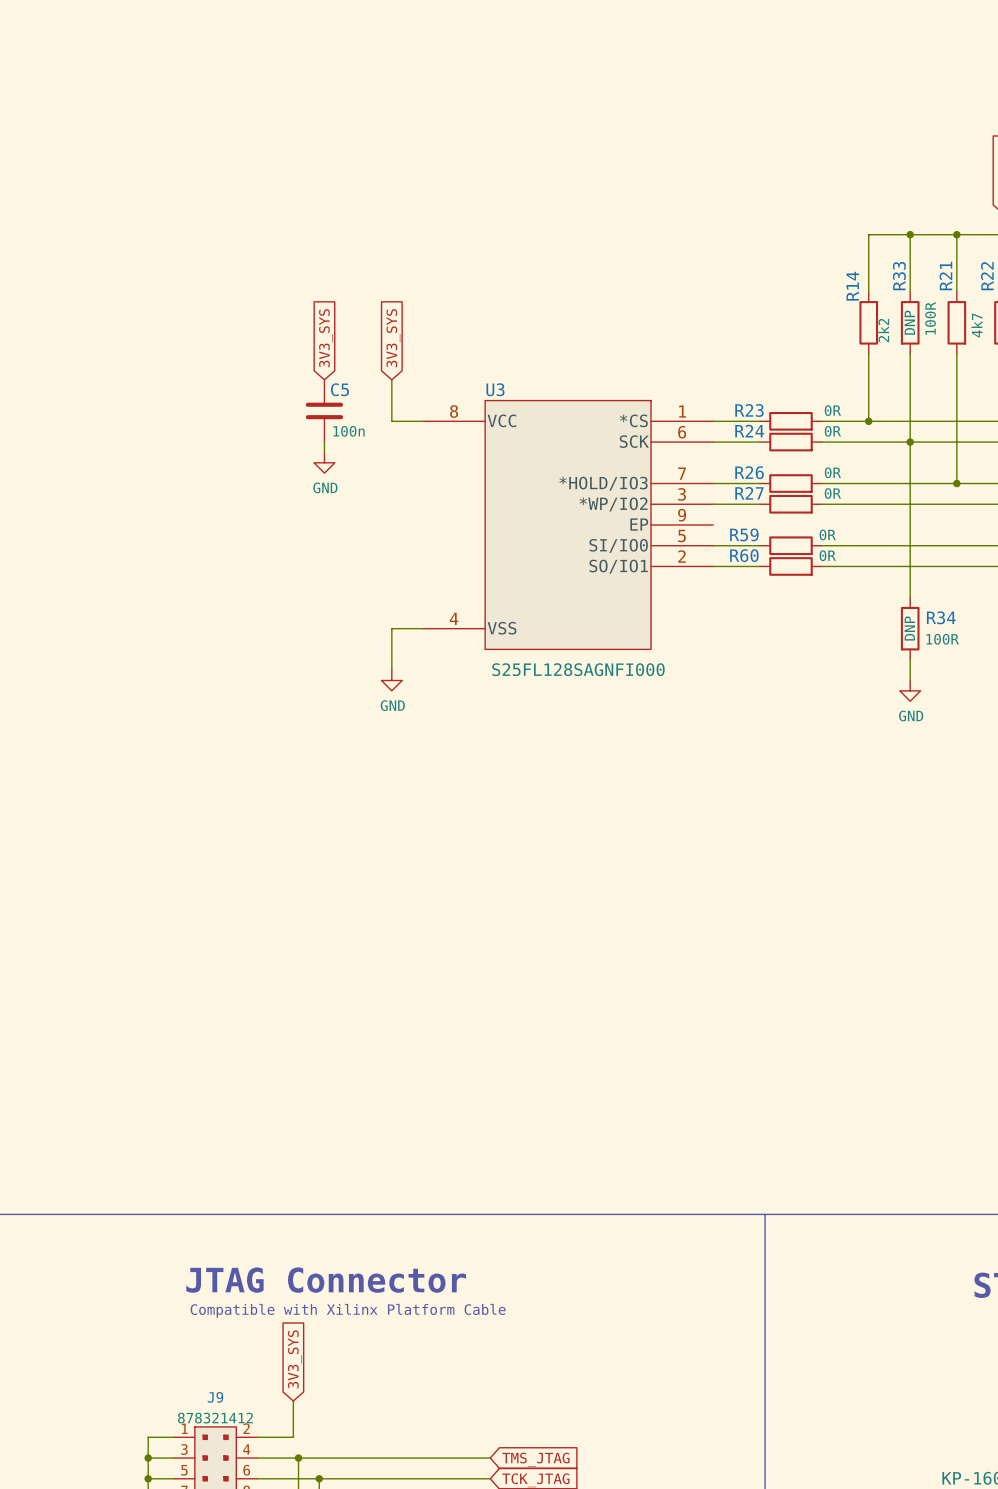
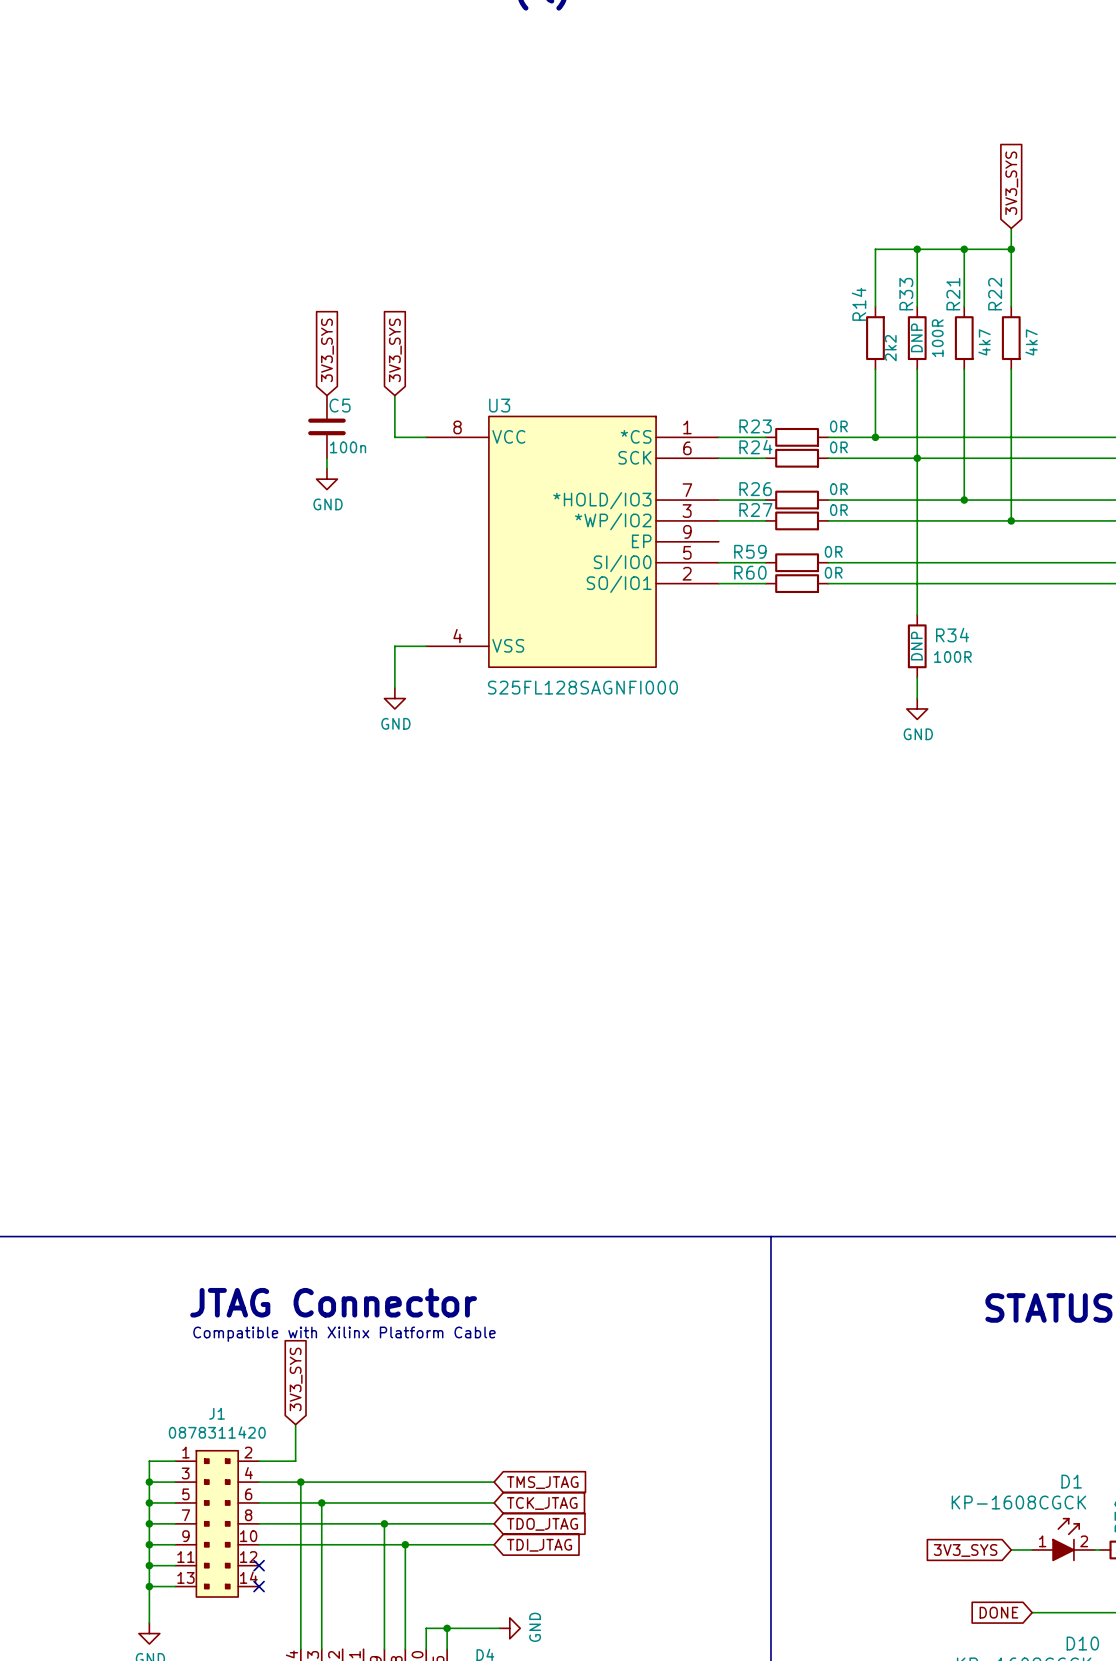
J9 name: J9 (215, 1397) -> J1 (217, 1413)
J9 value: 878321412 (215, 1418) -> 0878311420 (217, 1432)

